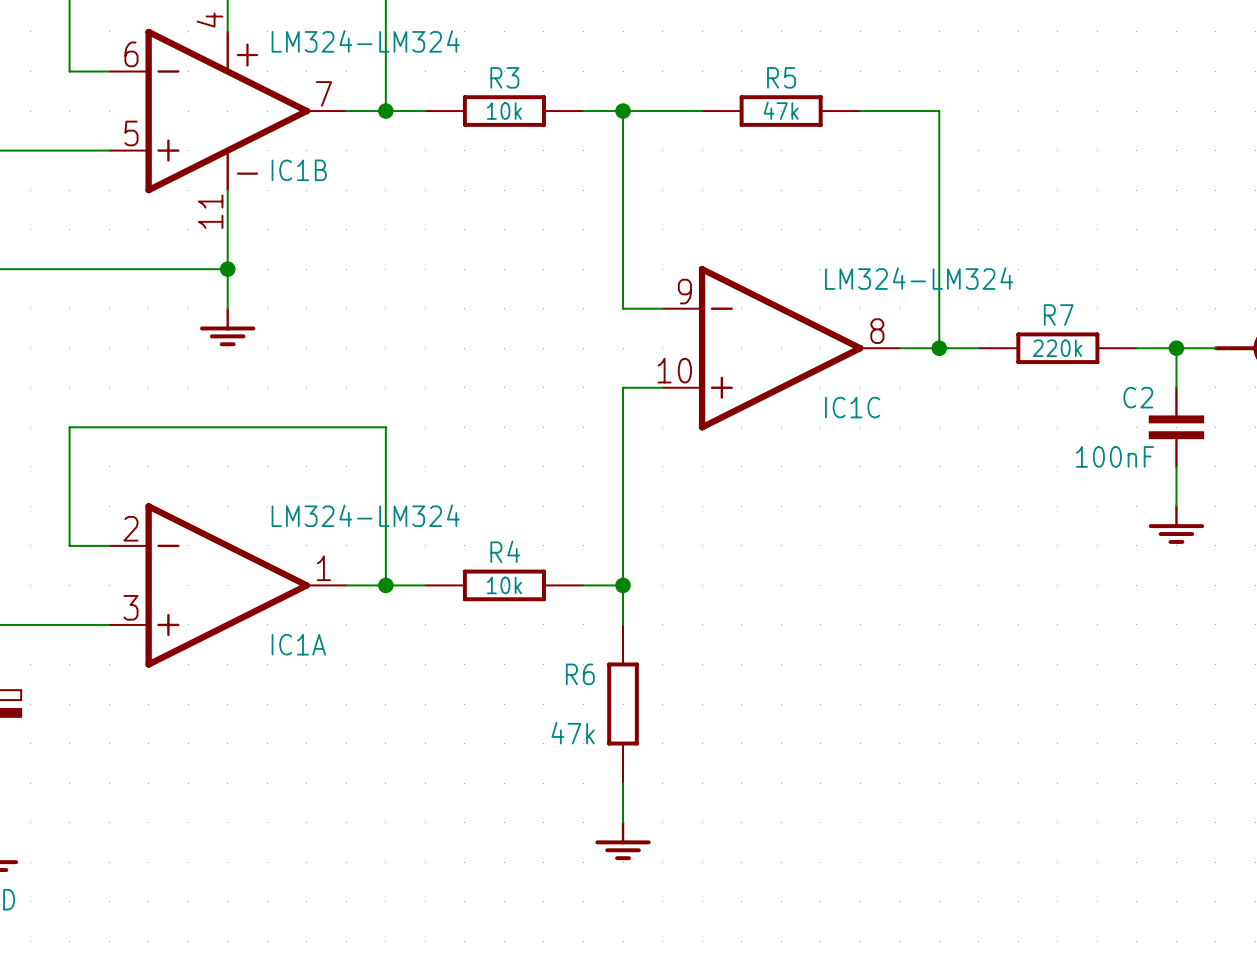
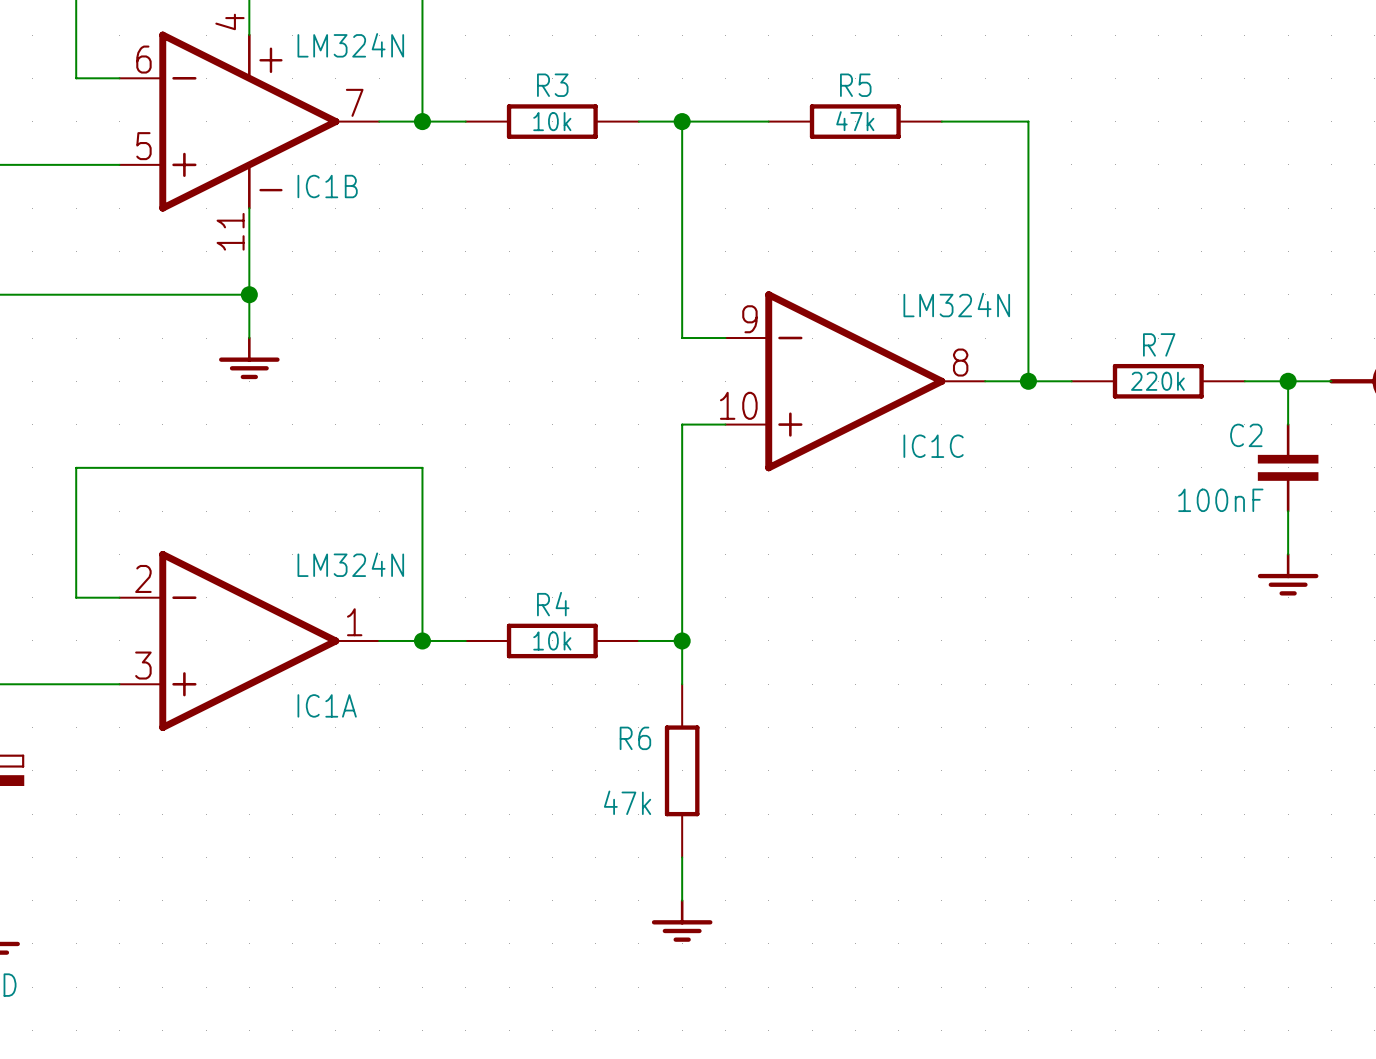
IC1B value: LM324-LM324 (365, 41) -> LM324N (350, 45)
IC1C value: LM324-LM324 (919, 278) -> LM324N (956, 305)
IC1A value: LM324-LM324 (365, 515) -> LM324N (350, 564)

